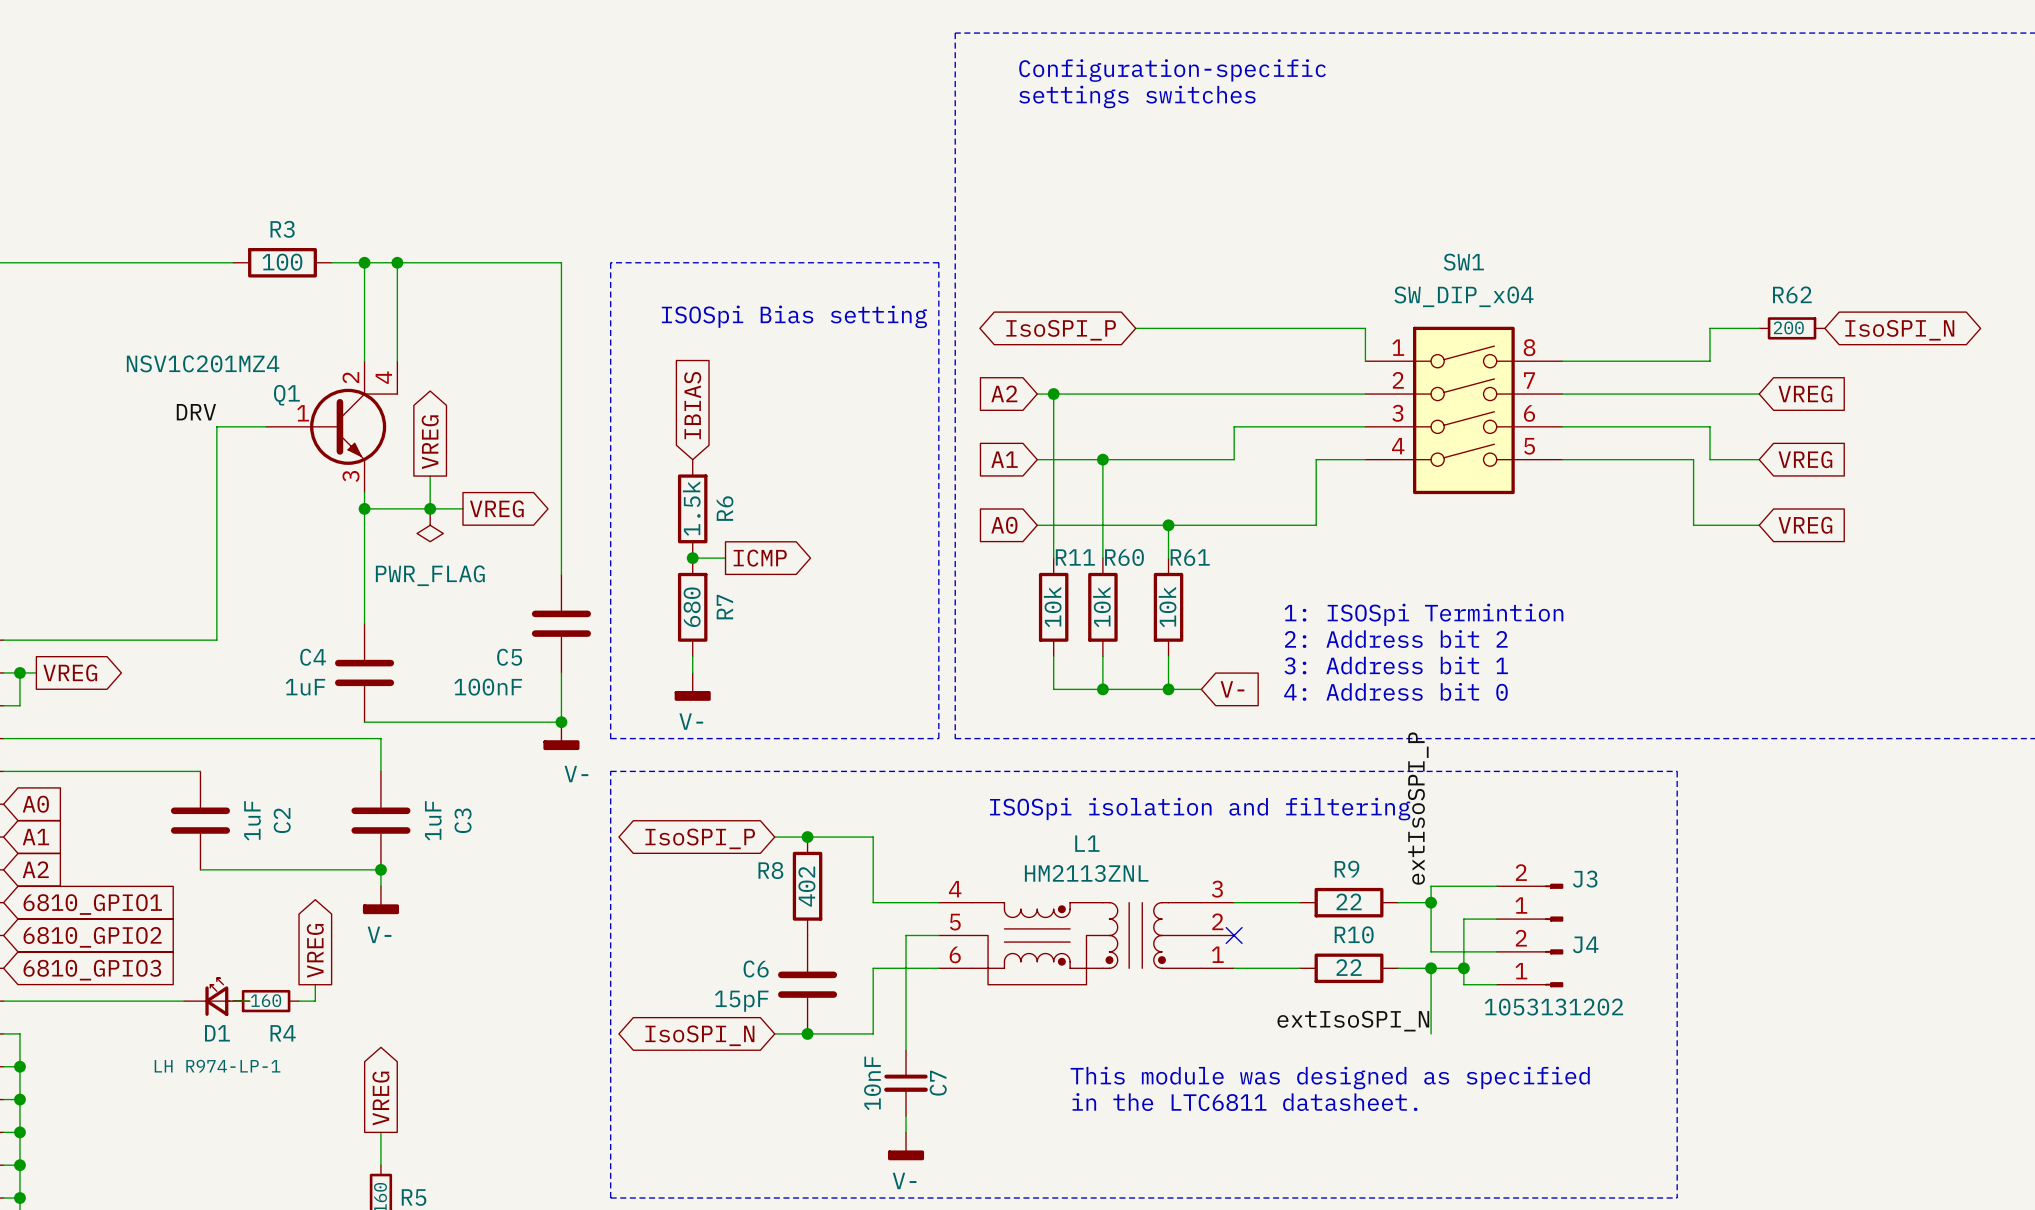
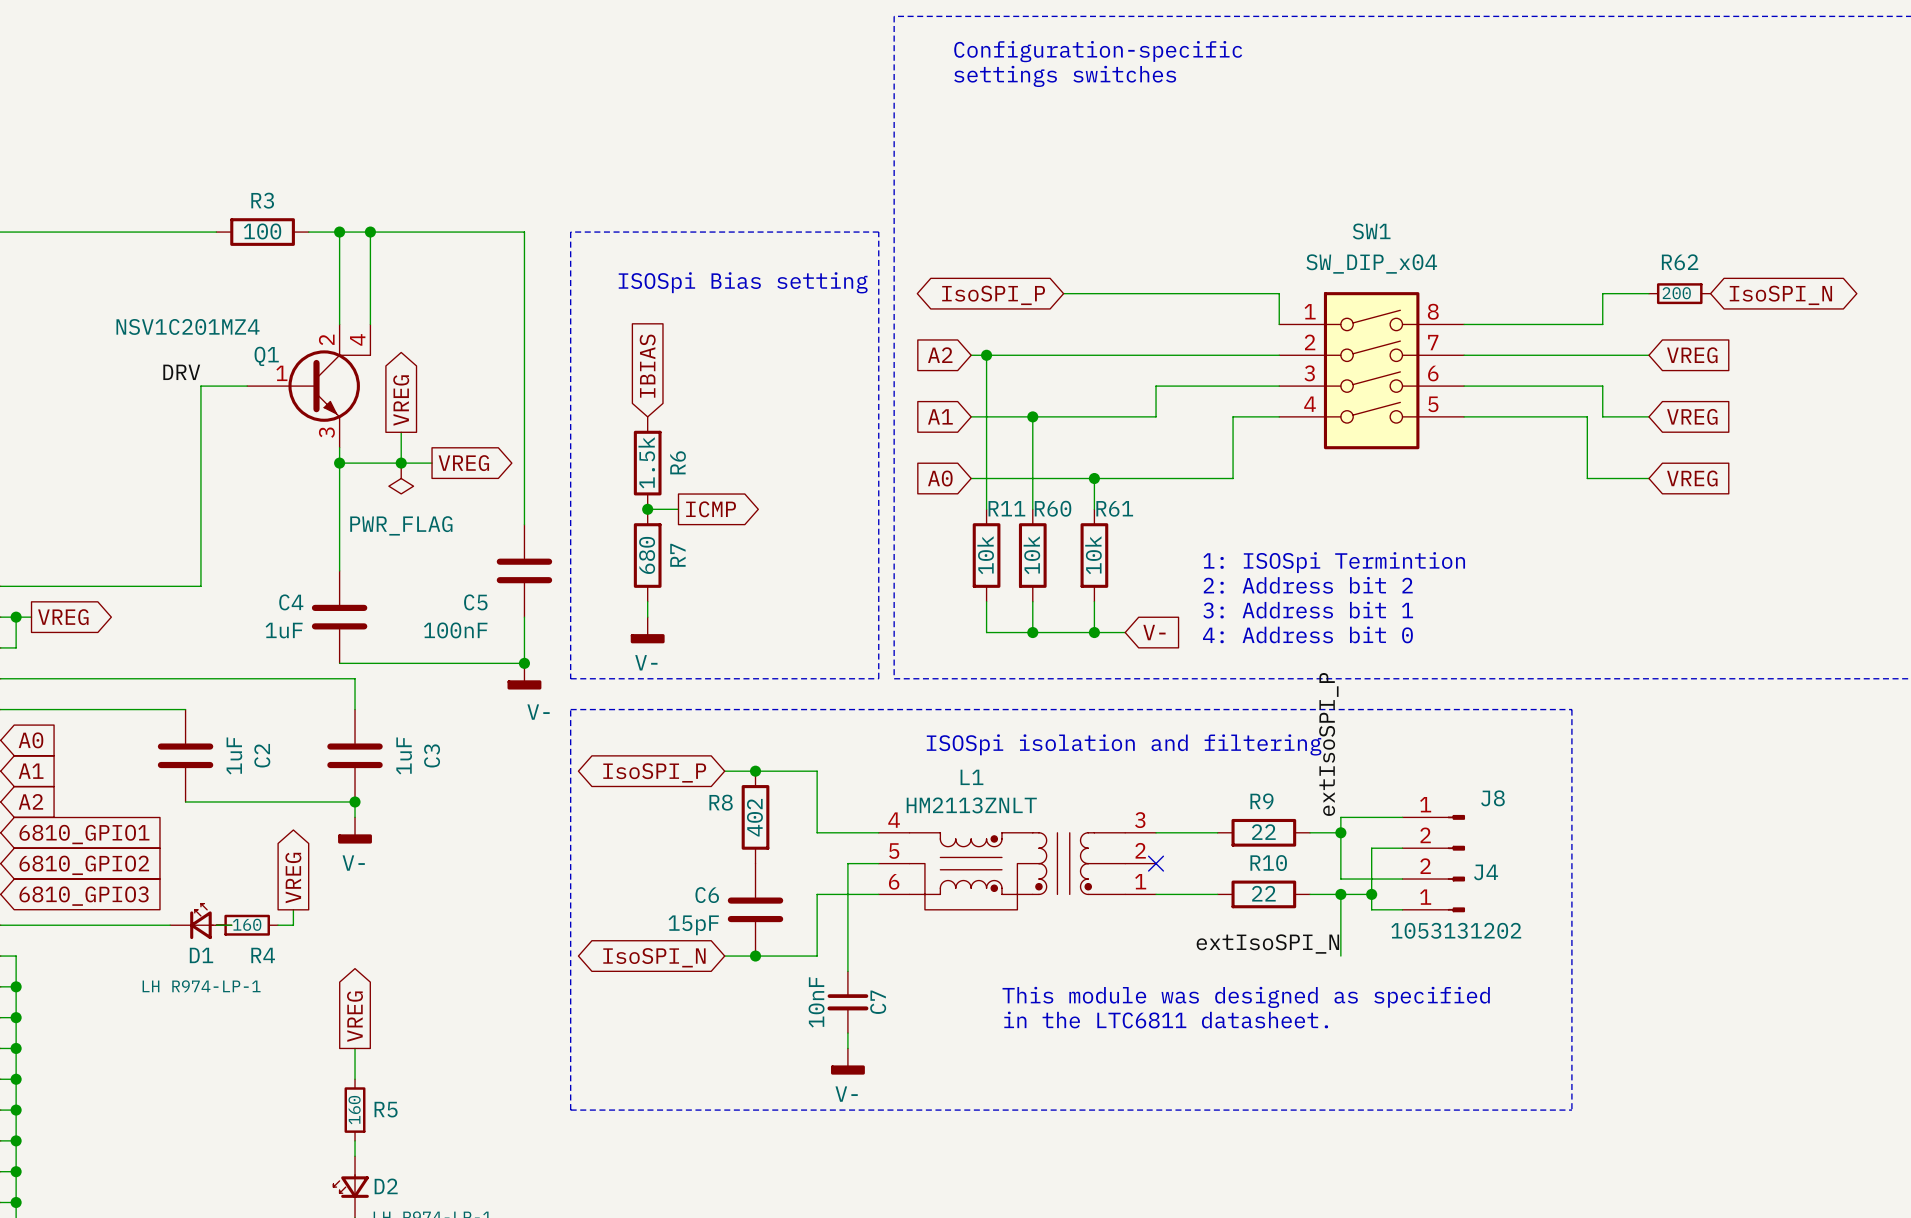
L1 name position: L1 (1087, 843) -> L1 (971, 777)
L1 value: HM2113ZNL (1086, 873) -> HM2113ZNLT (971, 805)
J3 name: J3 (1585, 879) -> J8 (1492, 798)
J3 flip: as is (1554, 902) -> up-down (1456, 832)

